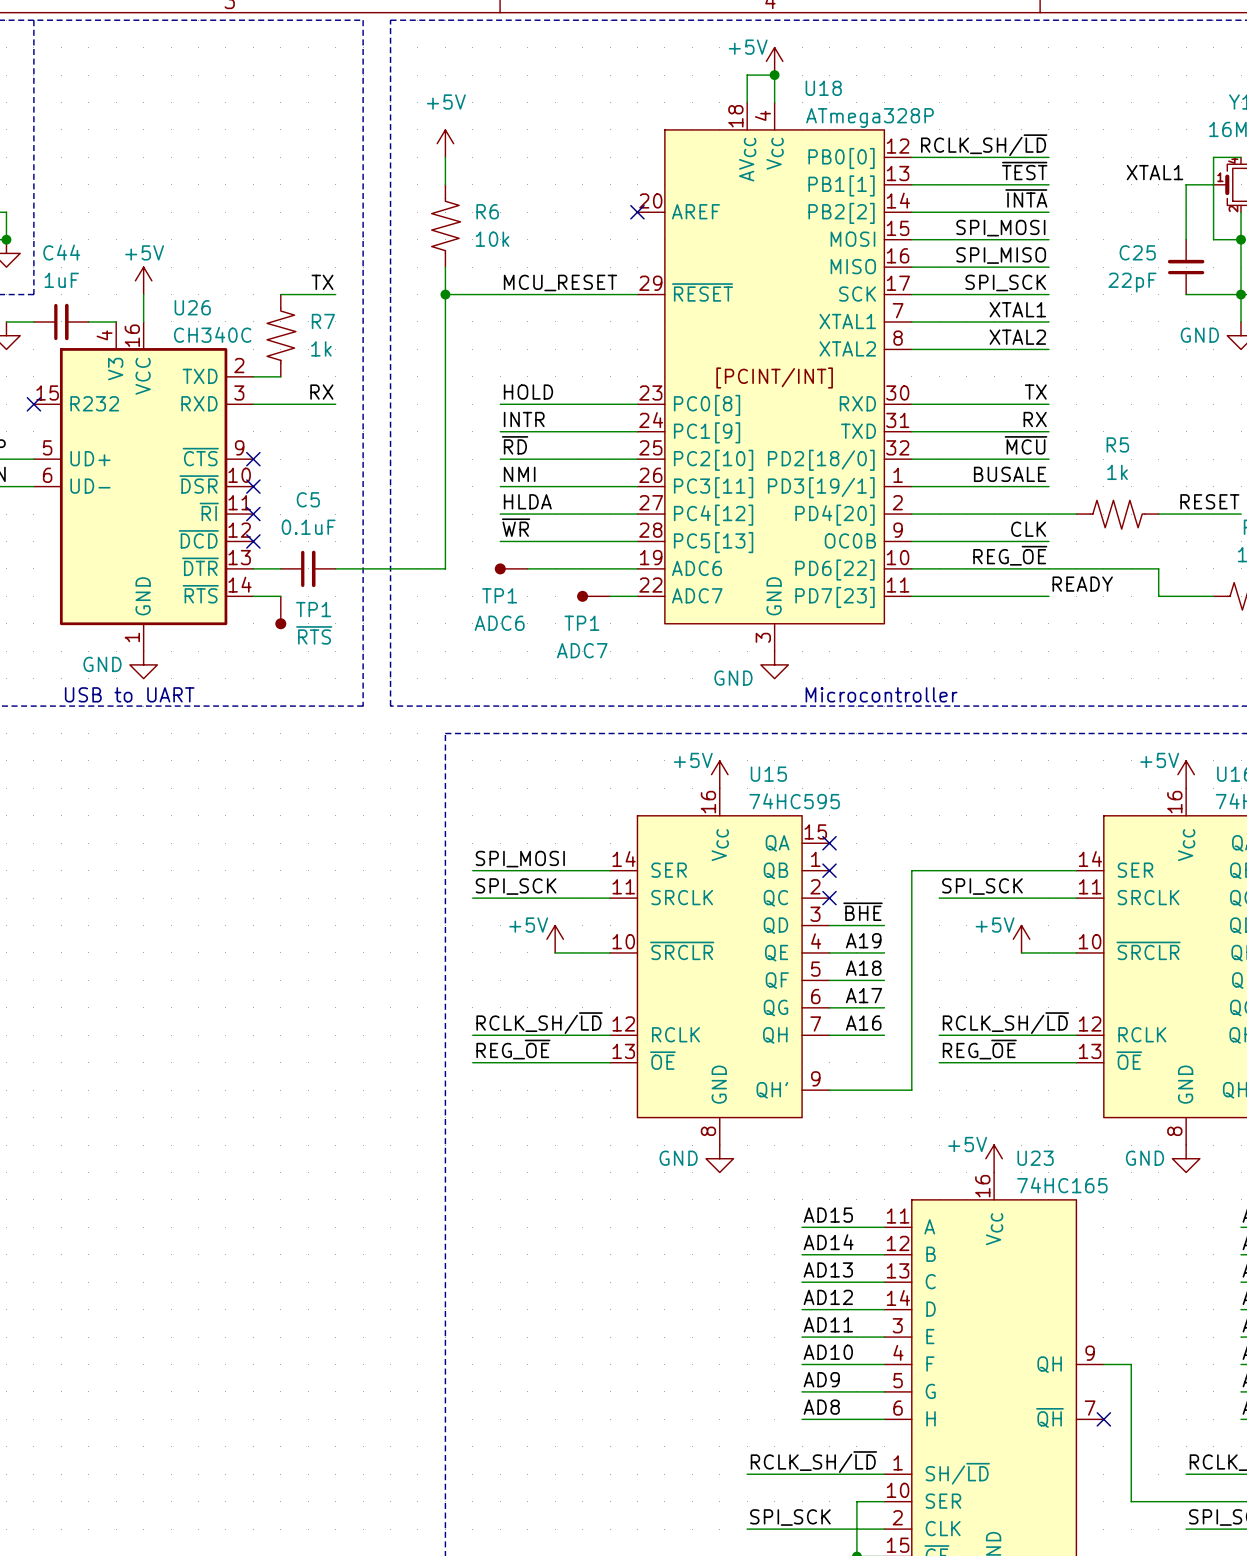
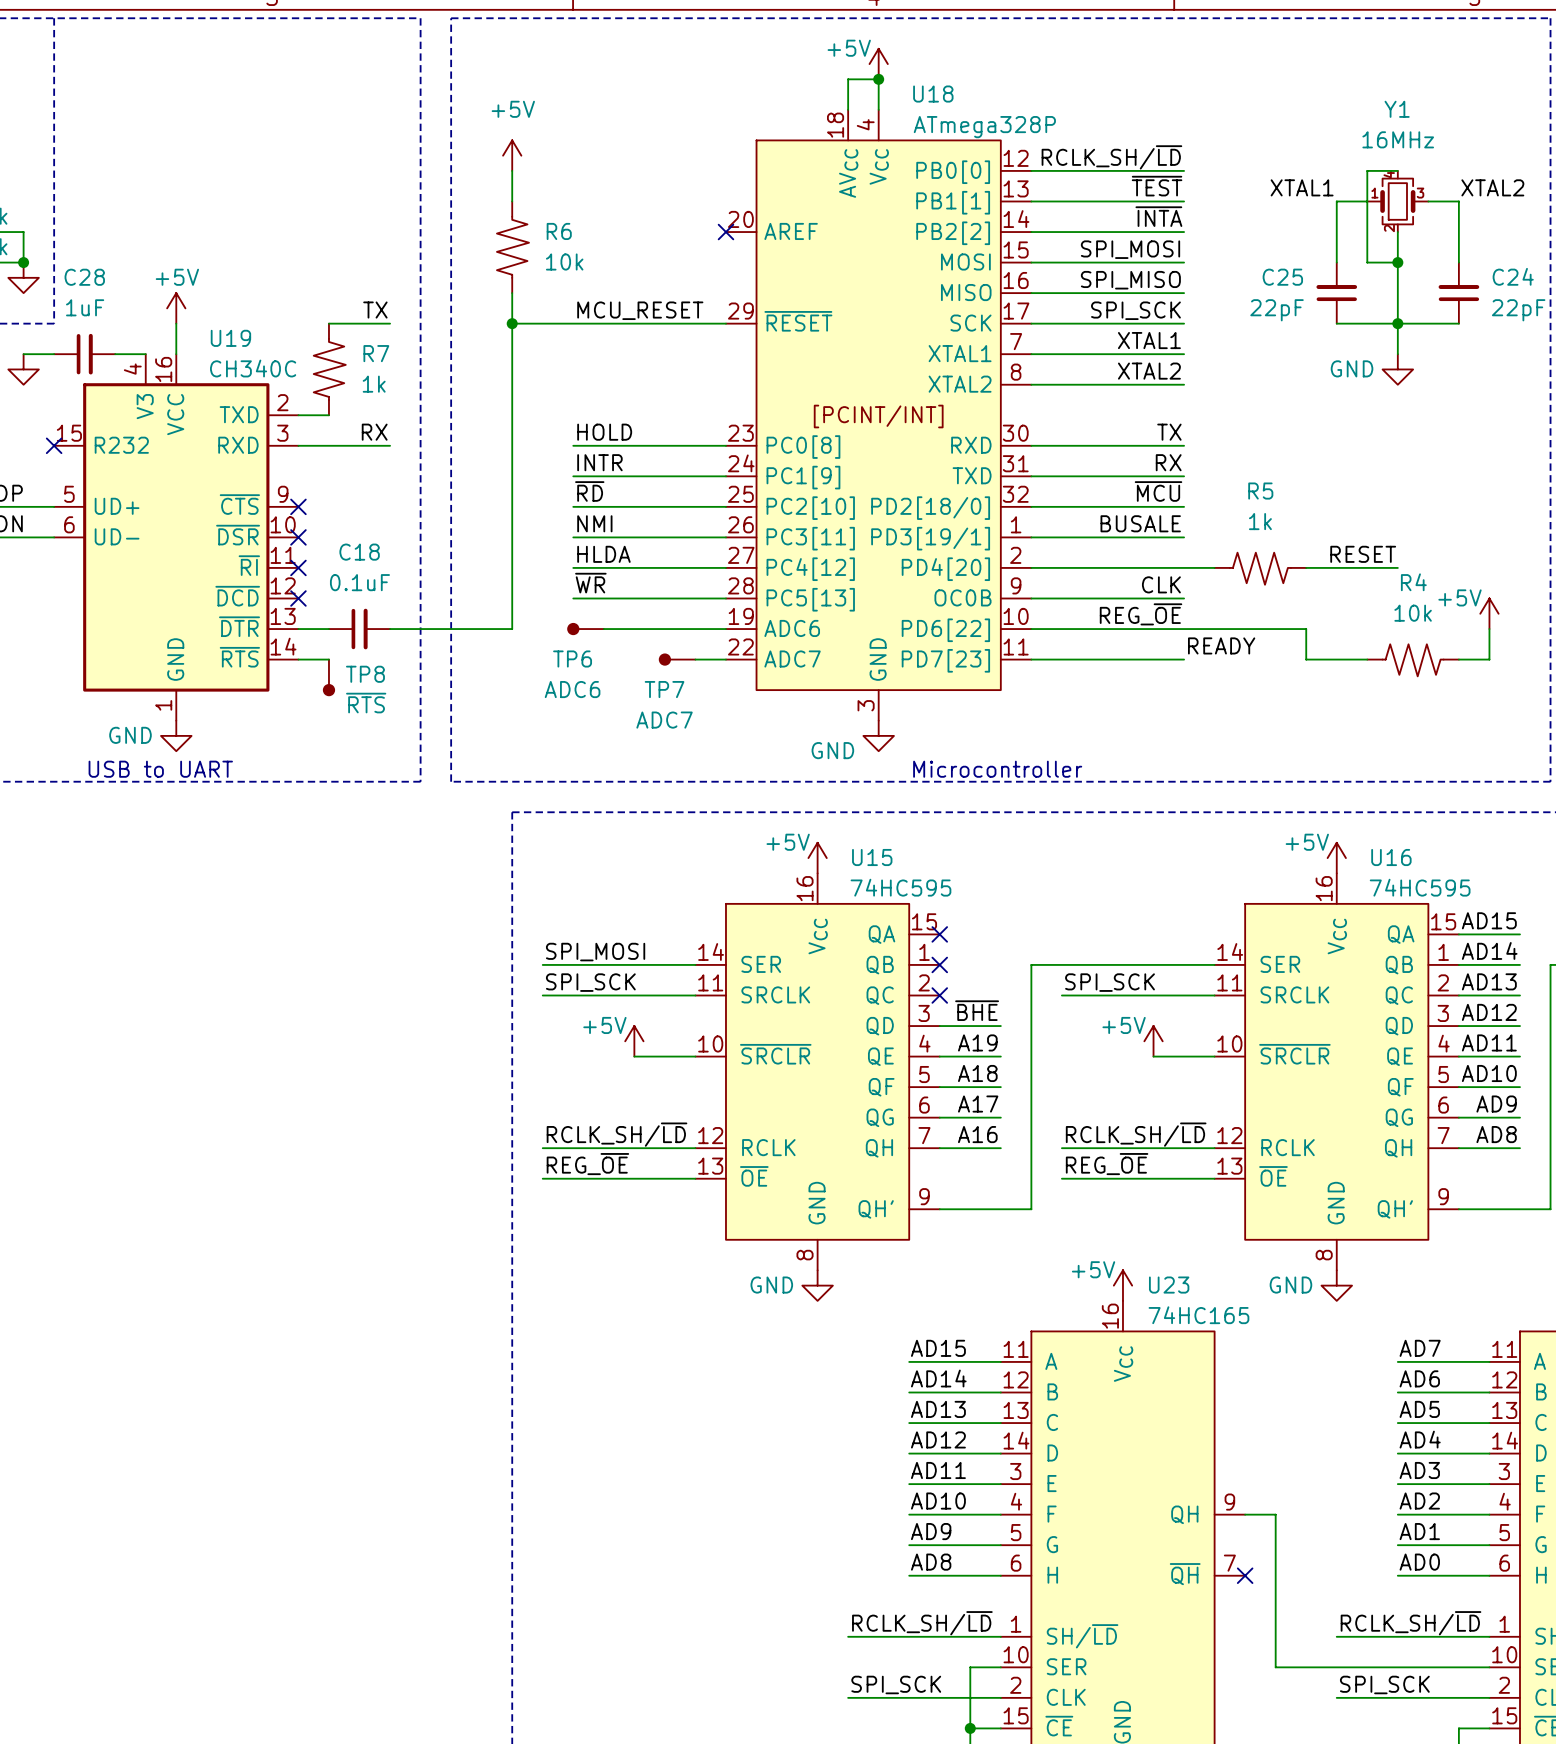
C44 name: C44 (61, 252) -> C28 (84, 277)
U26 name: U26 (192, 307) -> U19 (230, 338)
C5 name: C5 (308, 499) -> C18 (359, 552)
TP1 name: TP1 (499, 595) -> TP6 (572, 659)
TP1 name: TP1 (313, 609) -> TP8 (365, 674)
TP1 name: TP1 (581, 623) -> TP7 (664, 689)

